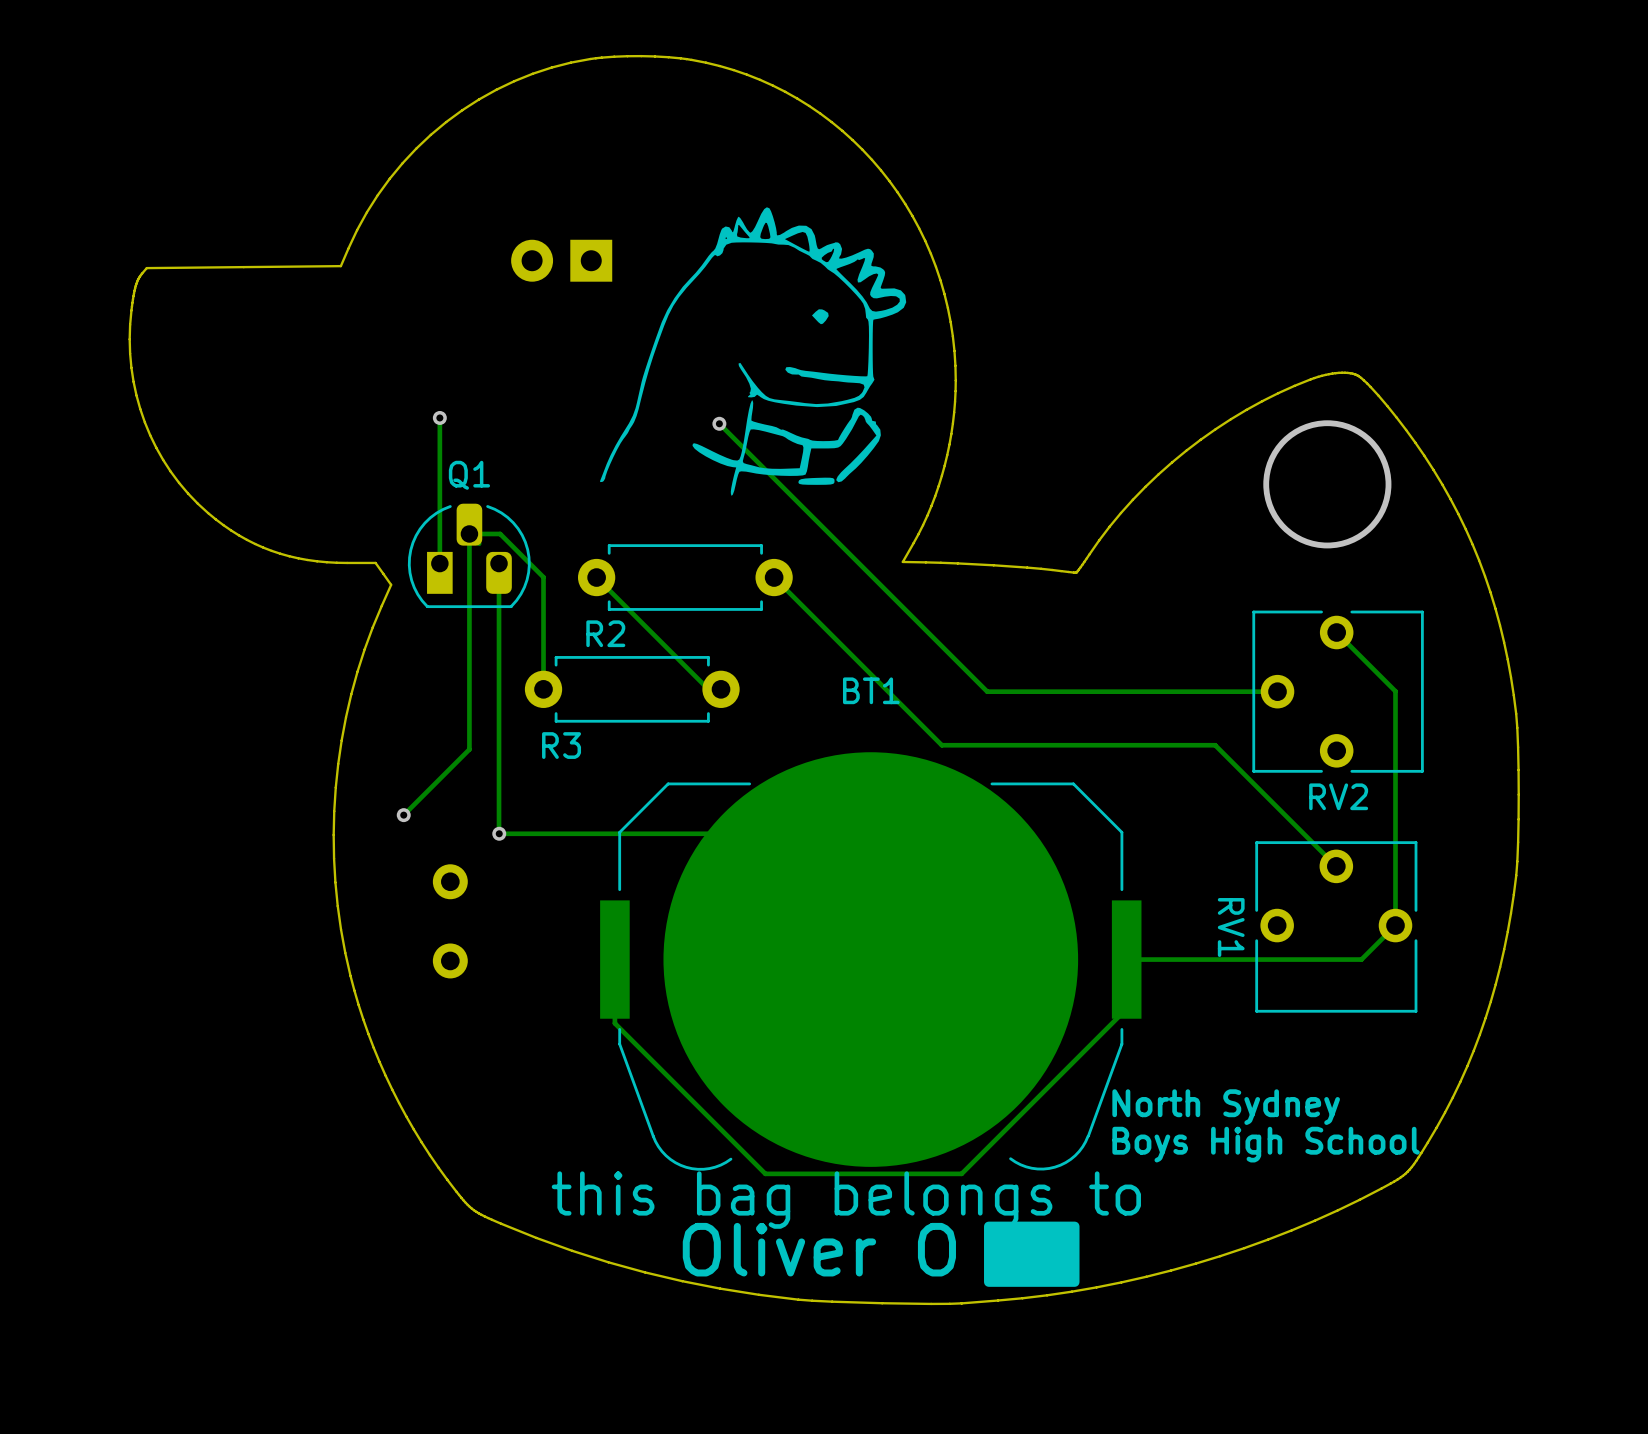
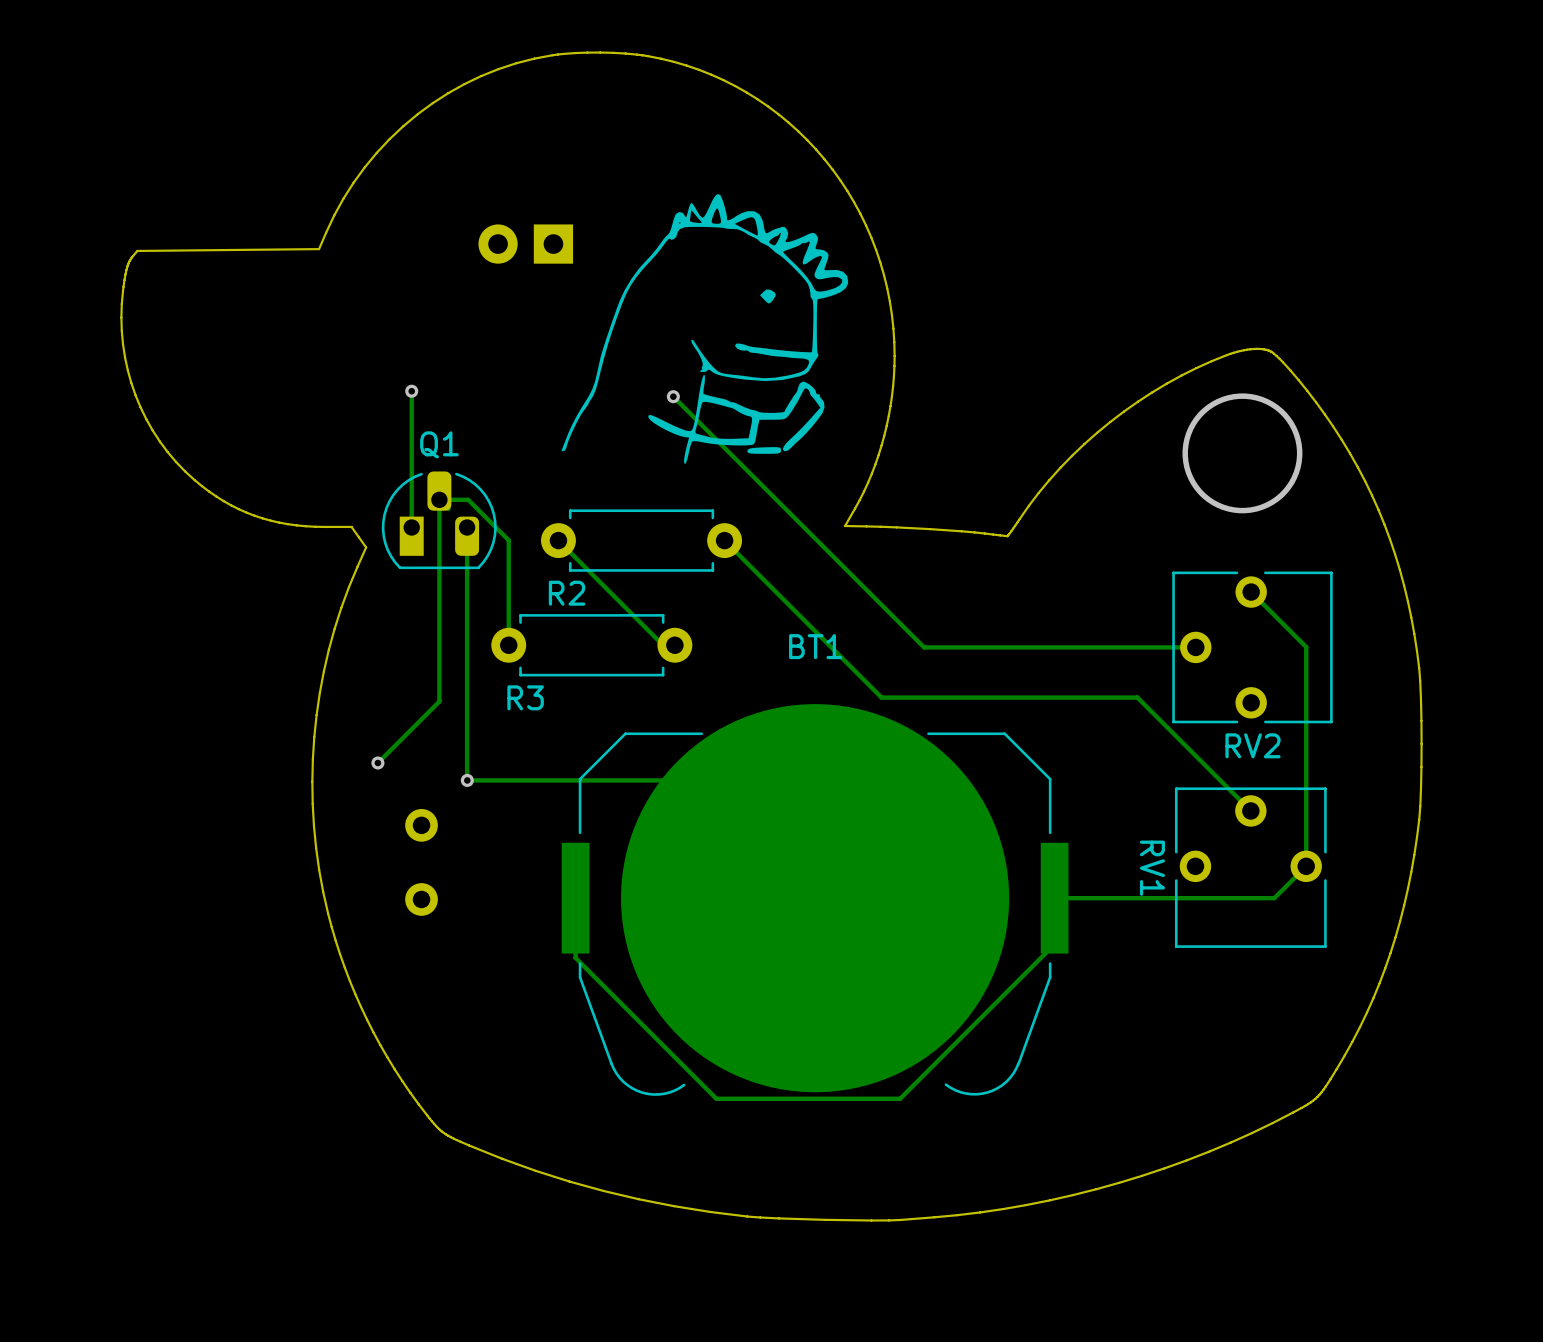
text: North Sydney (1226, 1107) -> none
text: Boys High School (1266, 1144) -> none
text: this bag belongs to (846, 1200) -> none
drawing: [984, 1221, 1080, 1287] -> none
text: Oliver O (819, 1249) -> none

